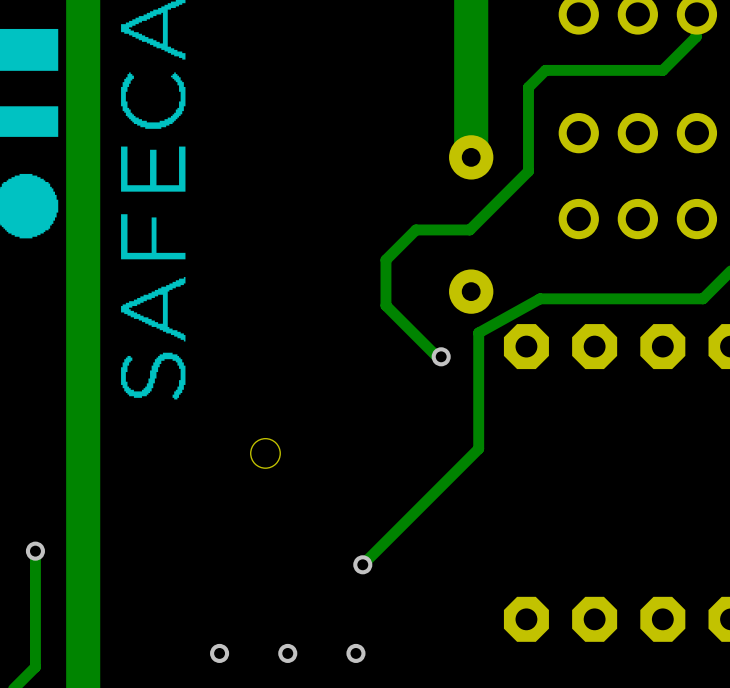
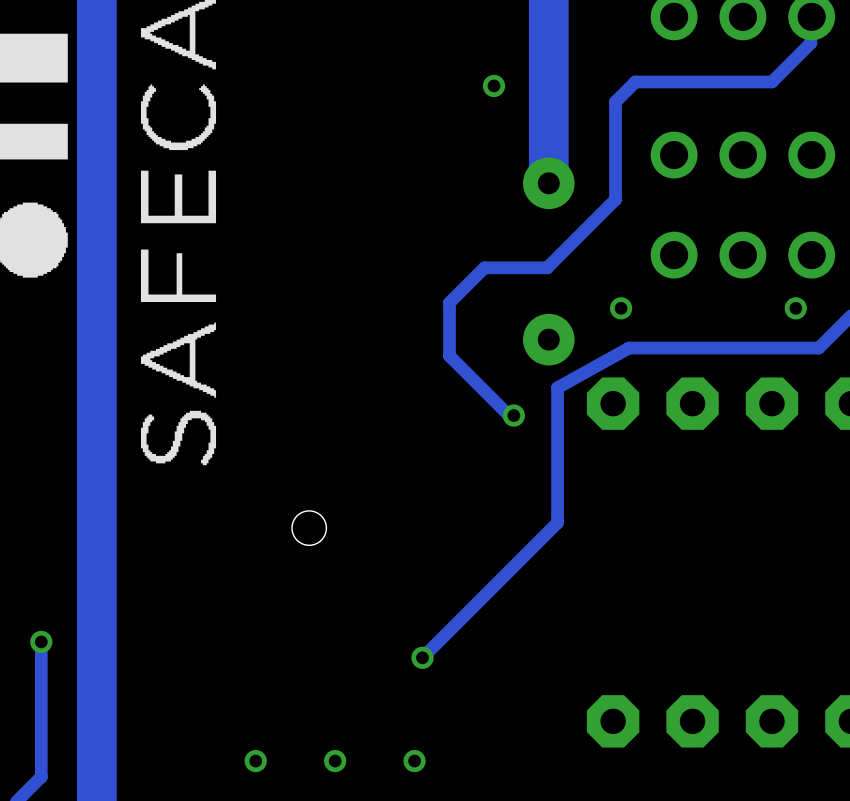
via: none -> (494, 85)
via: none -> (621, 308)
via: none -> (795, 308)

